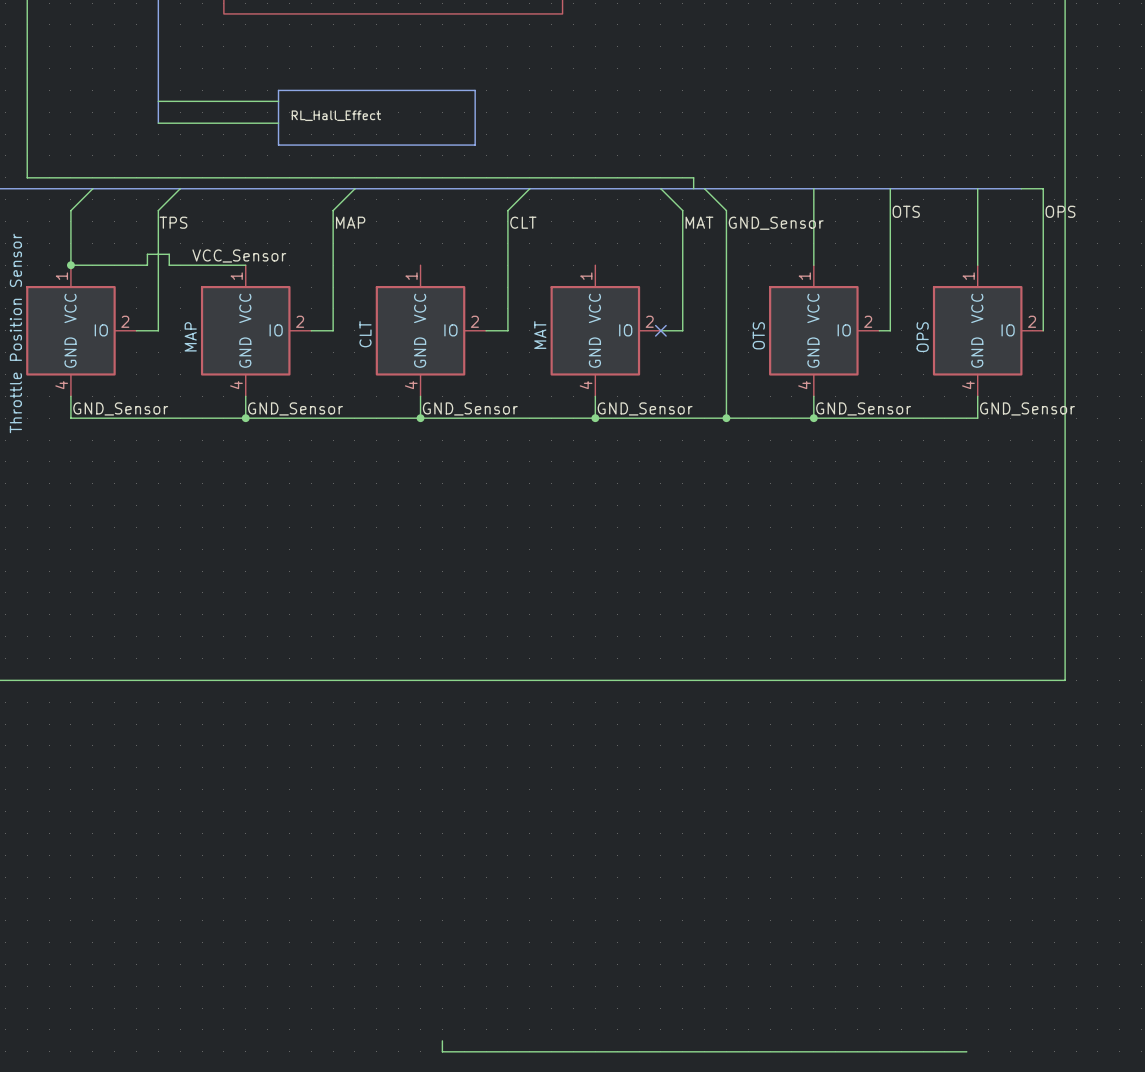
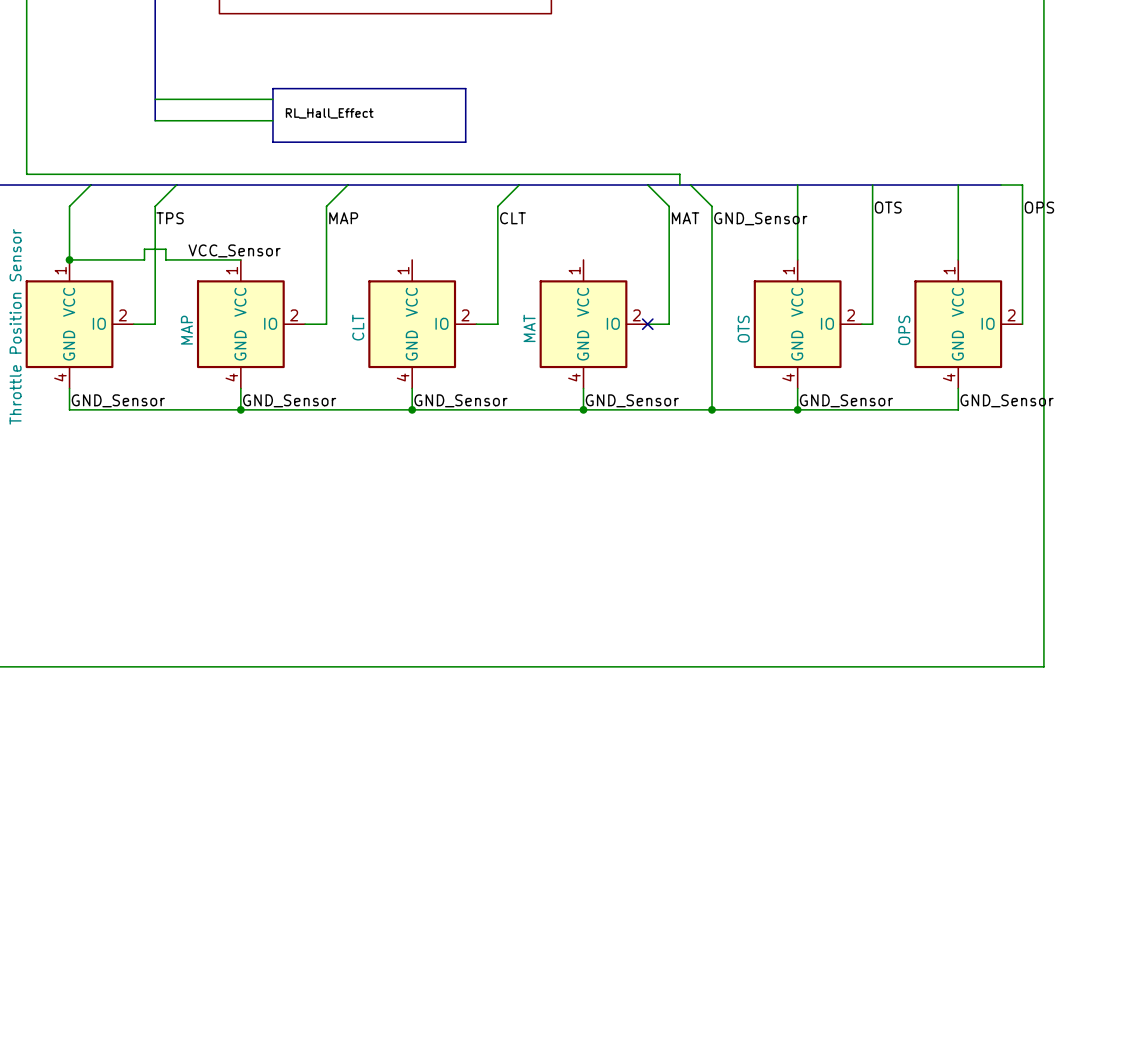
wire: (442, 1040) (442, 1051) (966, 1051) -> none

